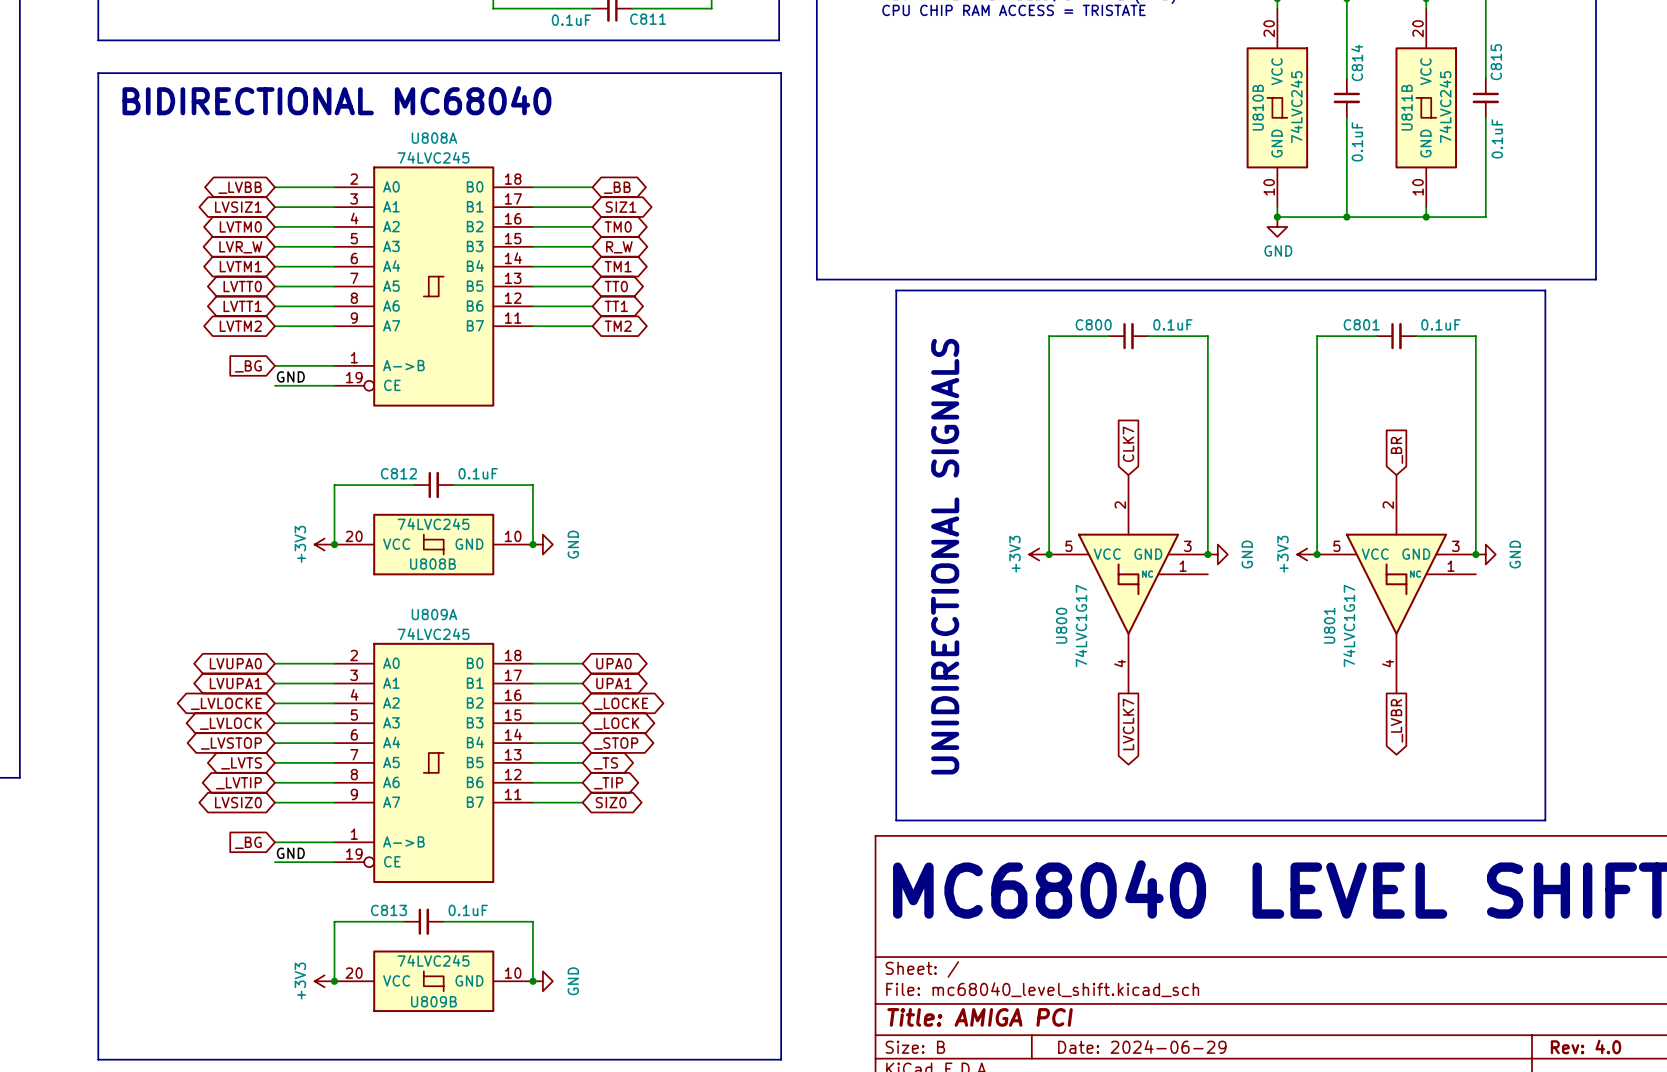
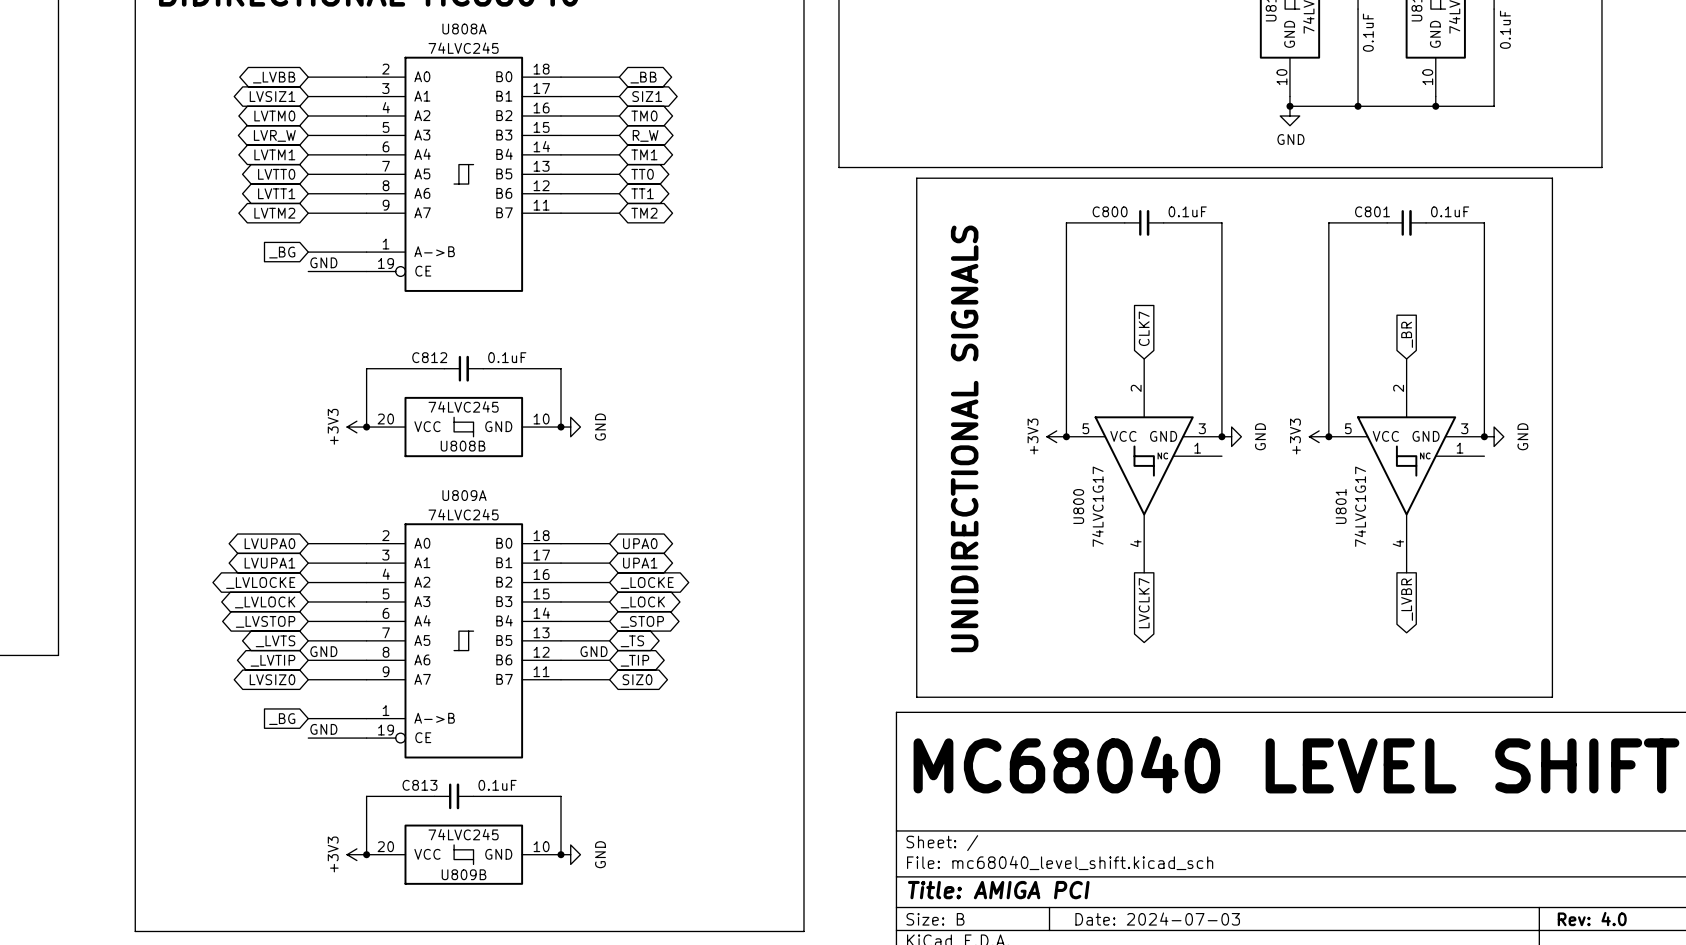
label: none -> GND (323, 651)
label: none -> GND (594, 651)
title block: Date: 2024-06-29 (1142, 1046) -> Date: 2024-07-03 (1157, 919)

